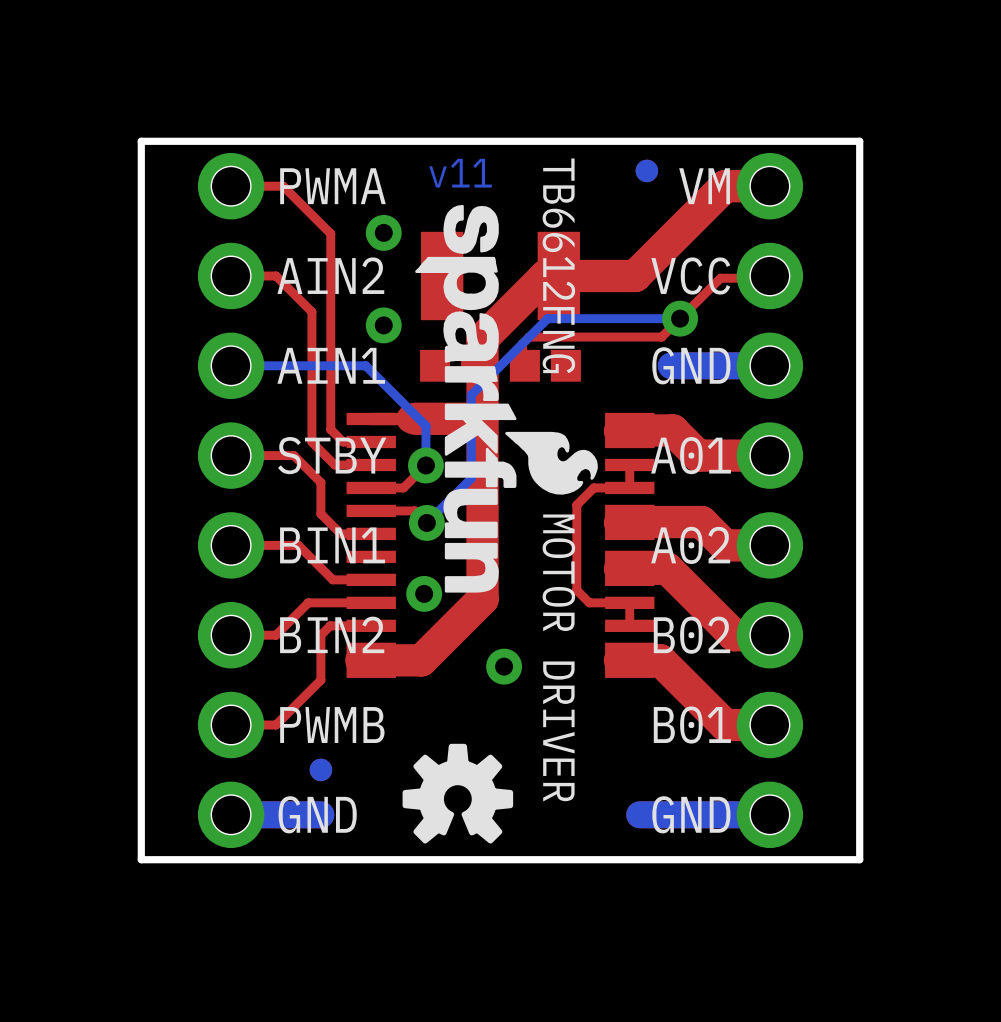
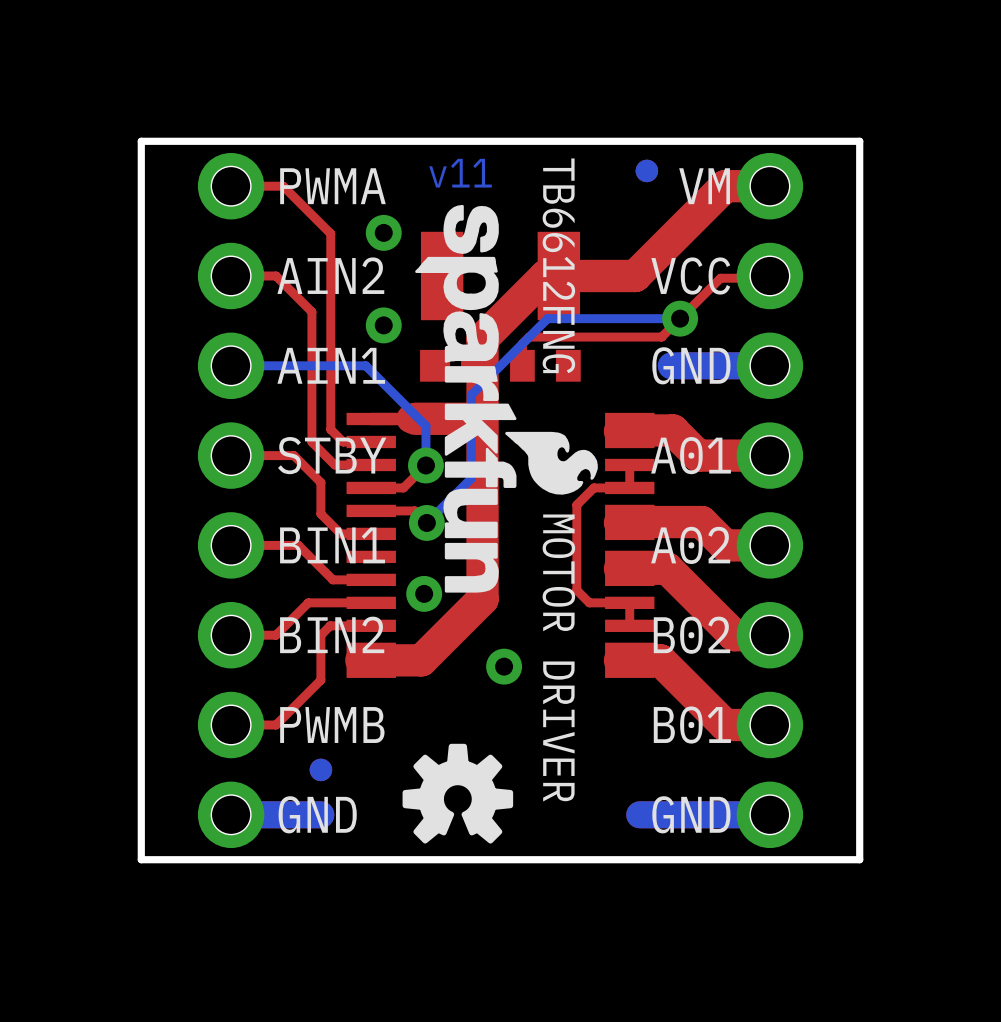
part footprint: [509, 349, 581, 382] -> [510, 349, 581, 382]

